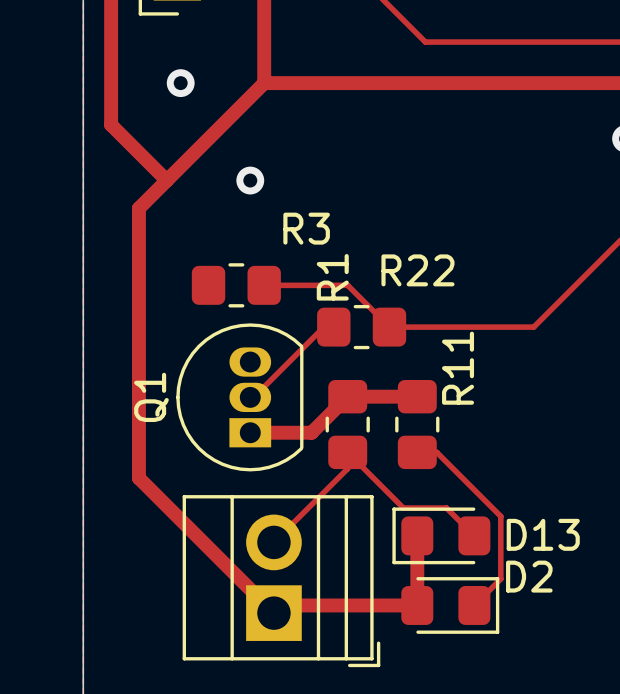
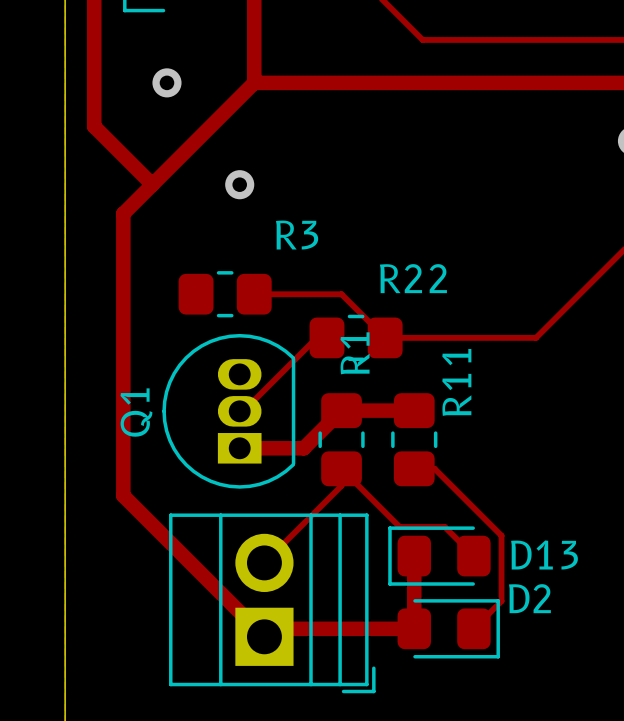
R1 name position: R1 (332, 277) -> R1 (355, 353)

